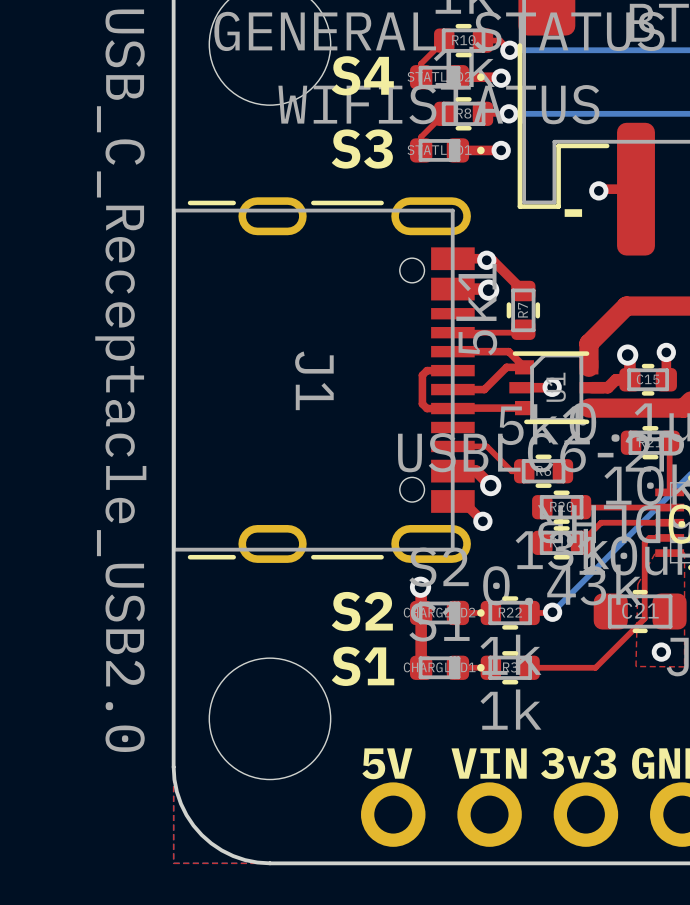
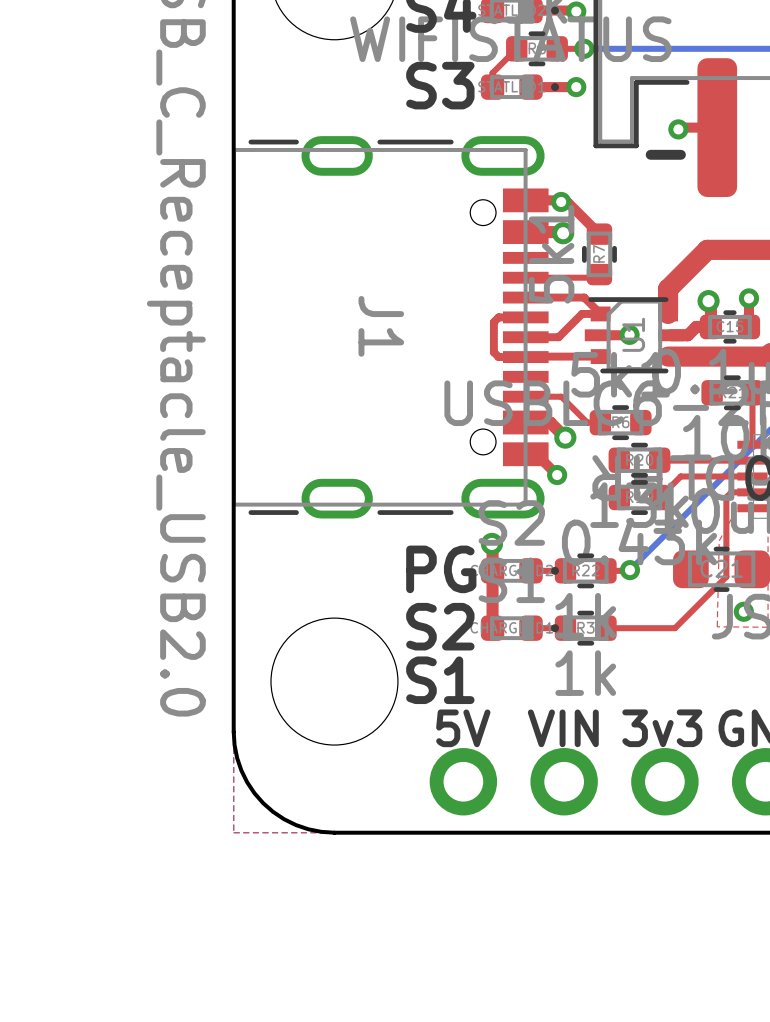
text: S2 (362, 611) -> PG (441, 569)
text: S1 (363, 666) -> S2 (440, 626)
text: none -> S1 (440, 680)

